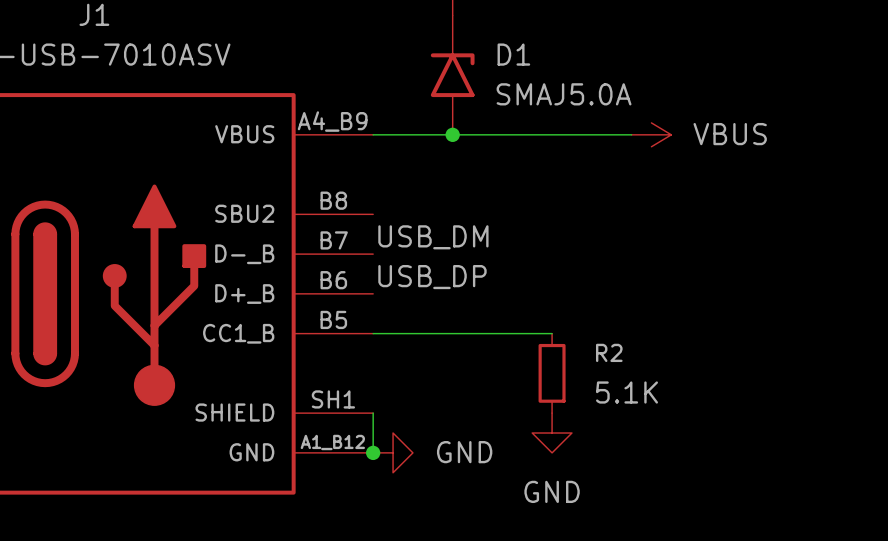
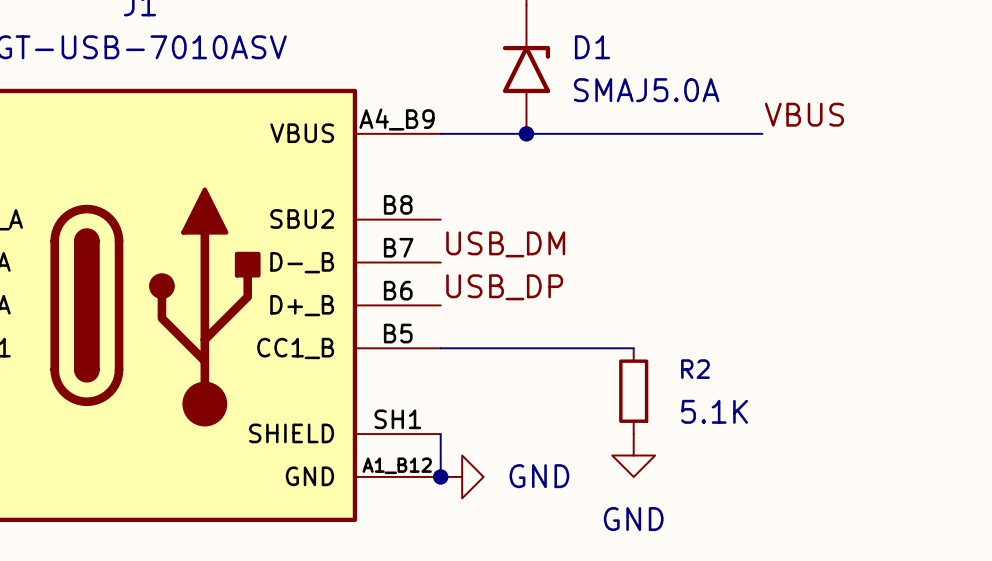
label: none -> VBUS (804, 114)
power symbol: VBUS (651, 134) -> none

